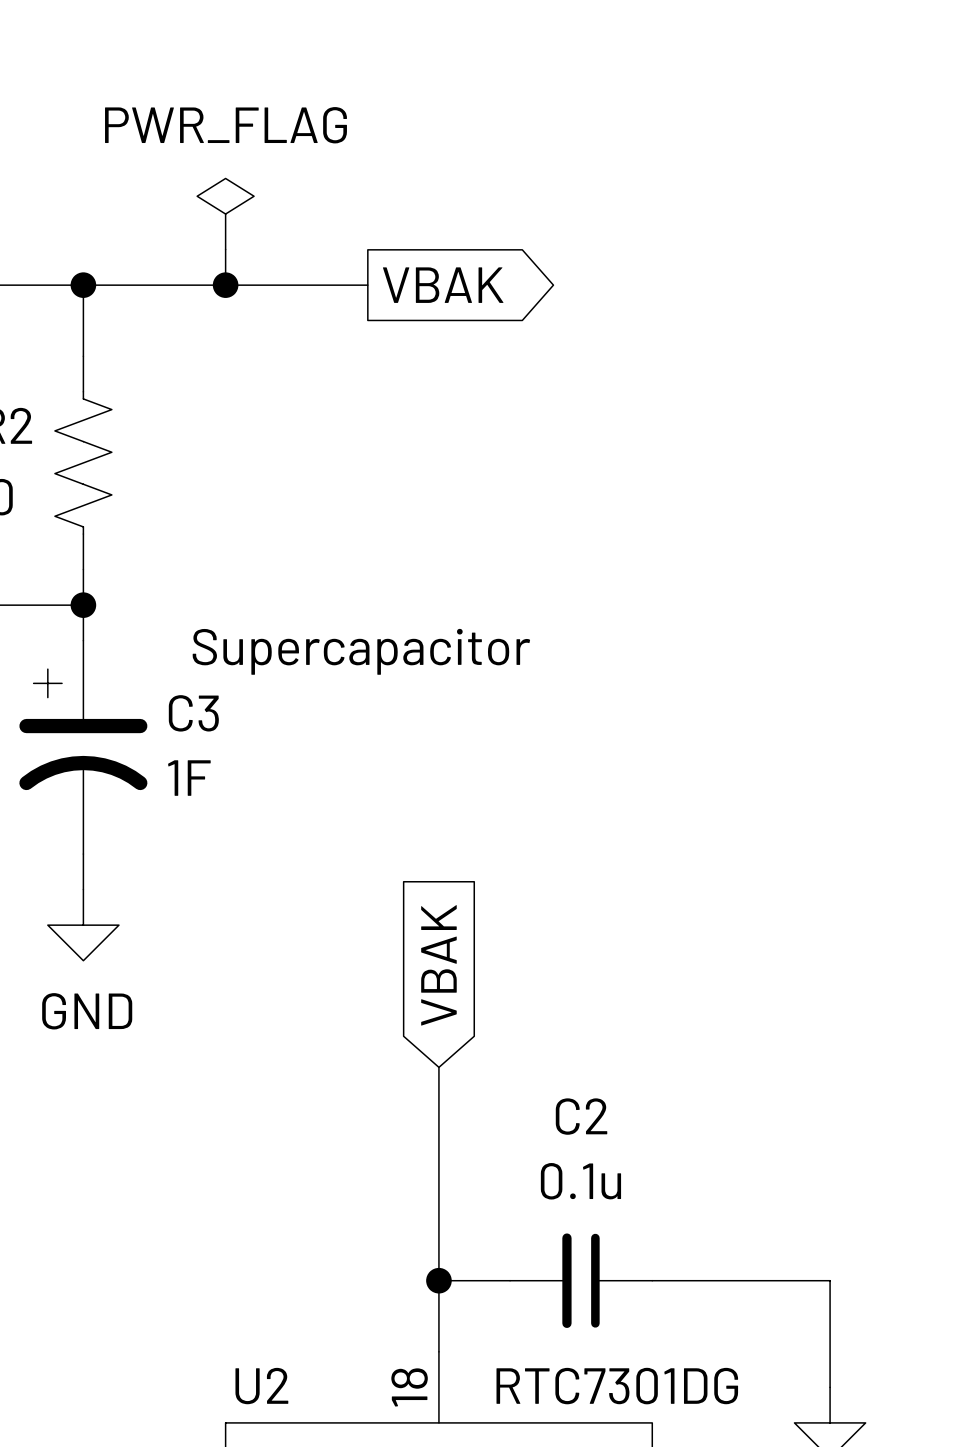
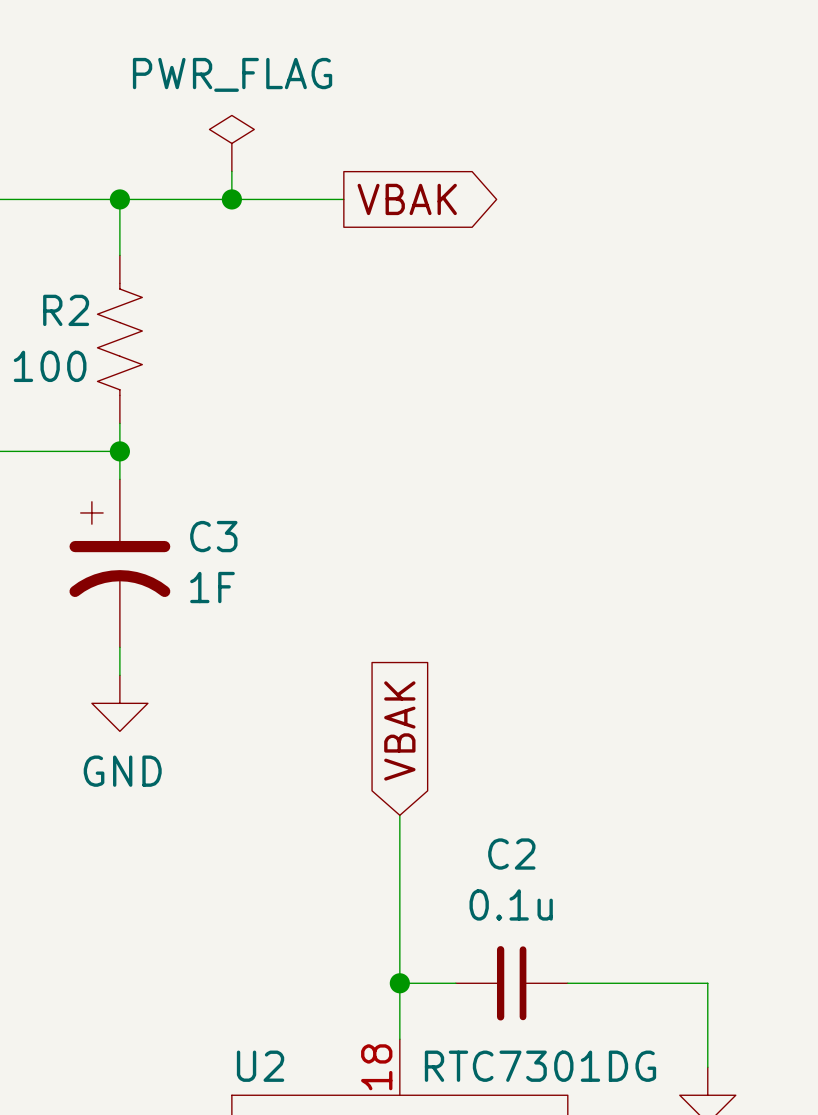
text: Supercapacitor (361, 651) -> none

